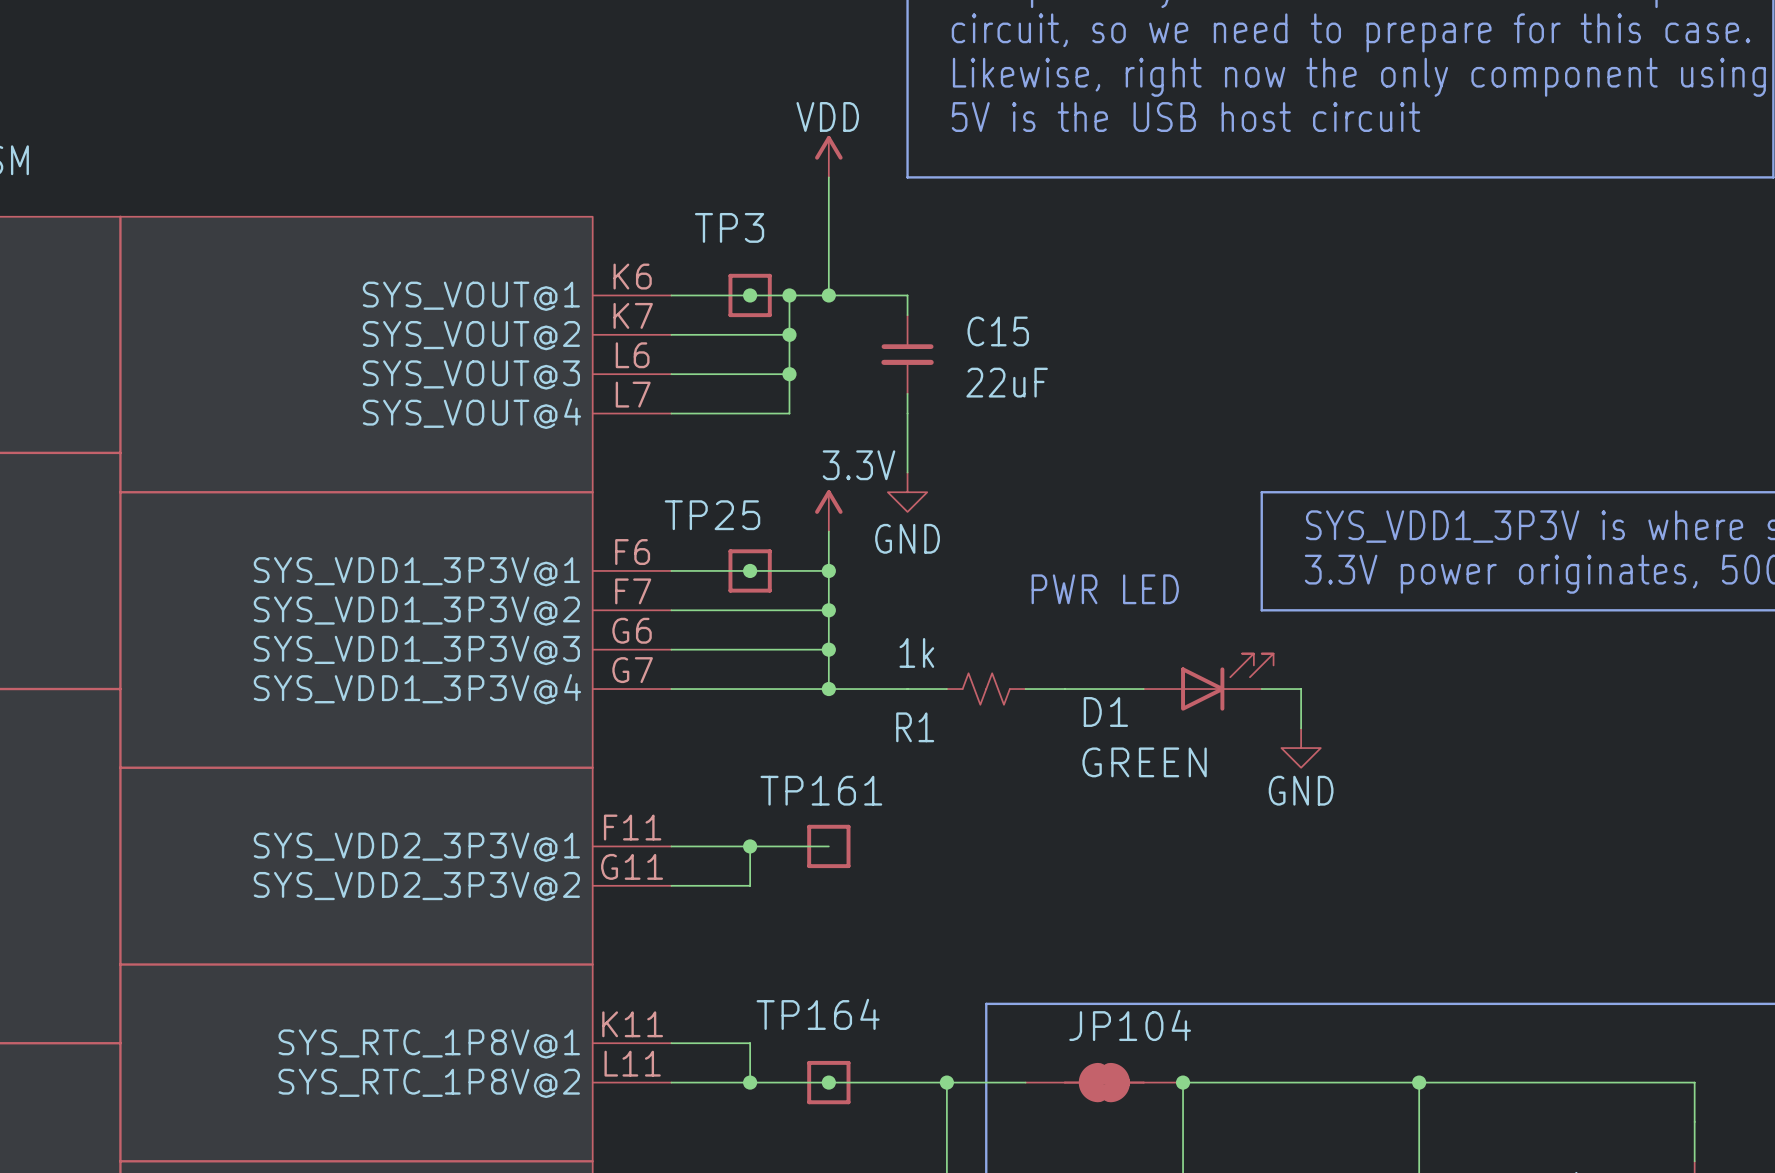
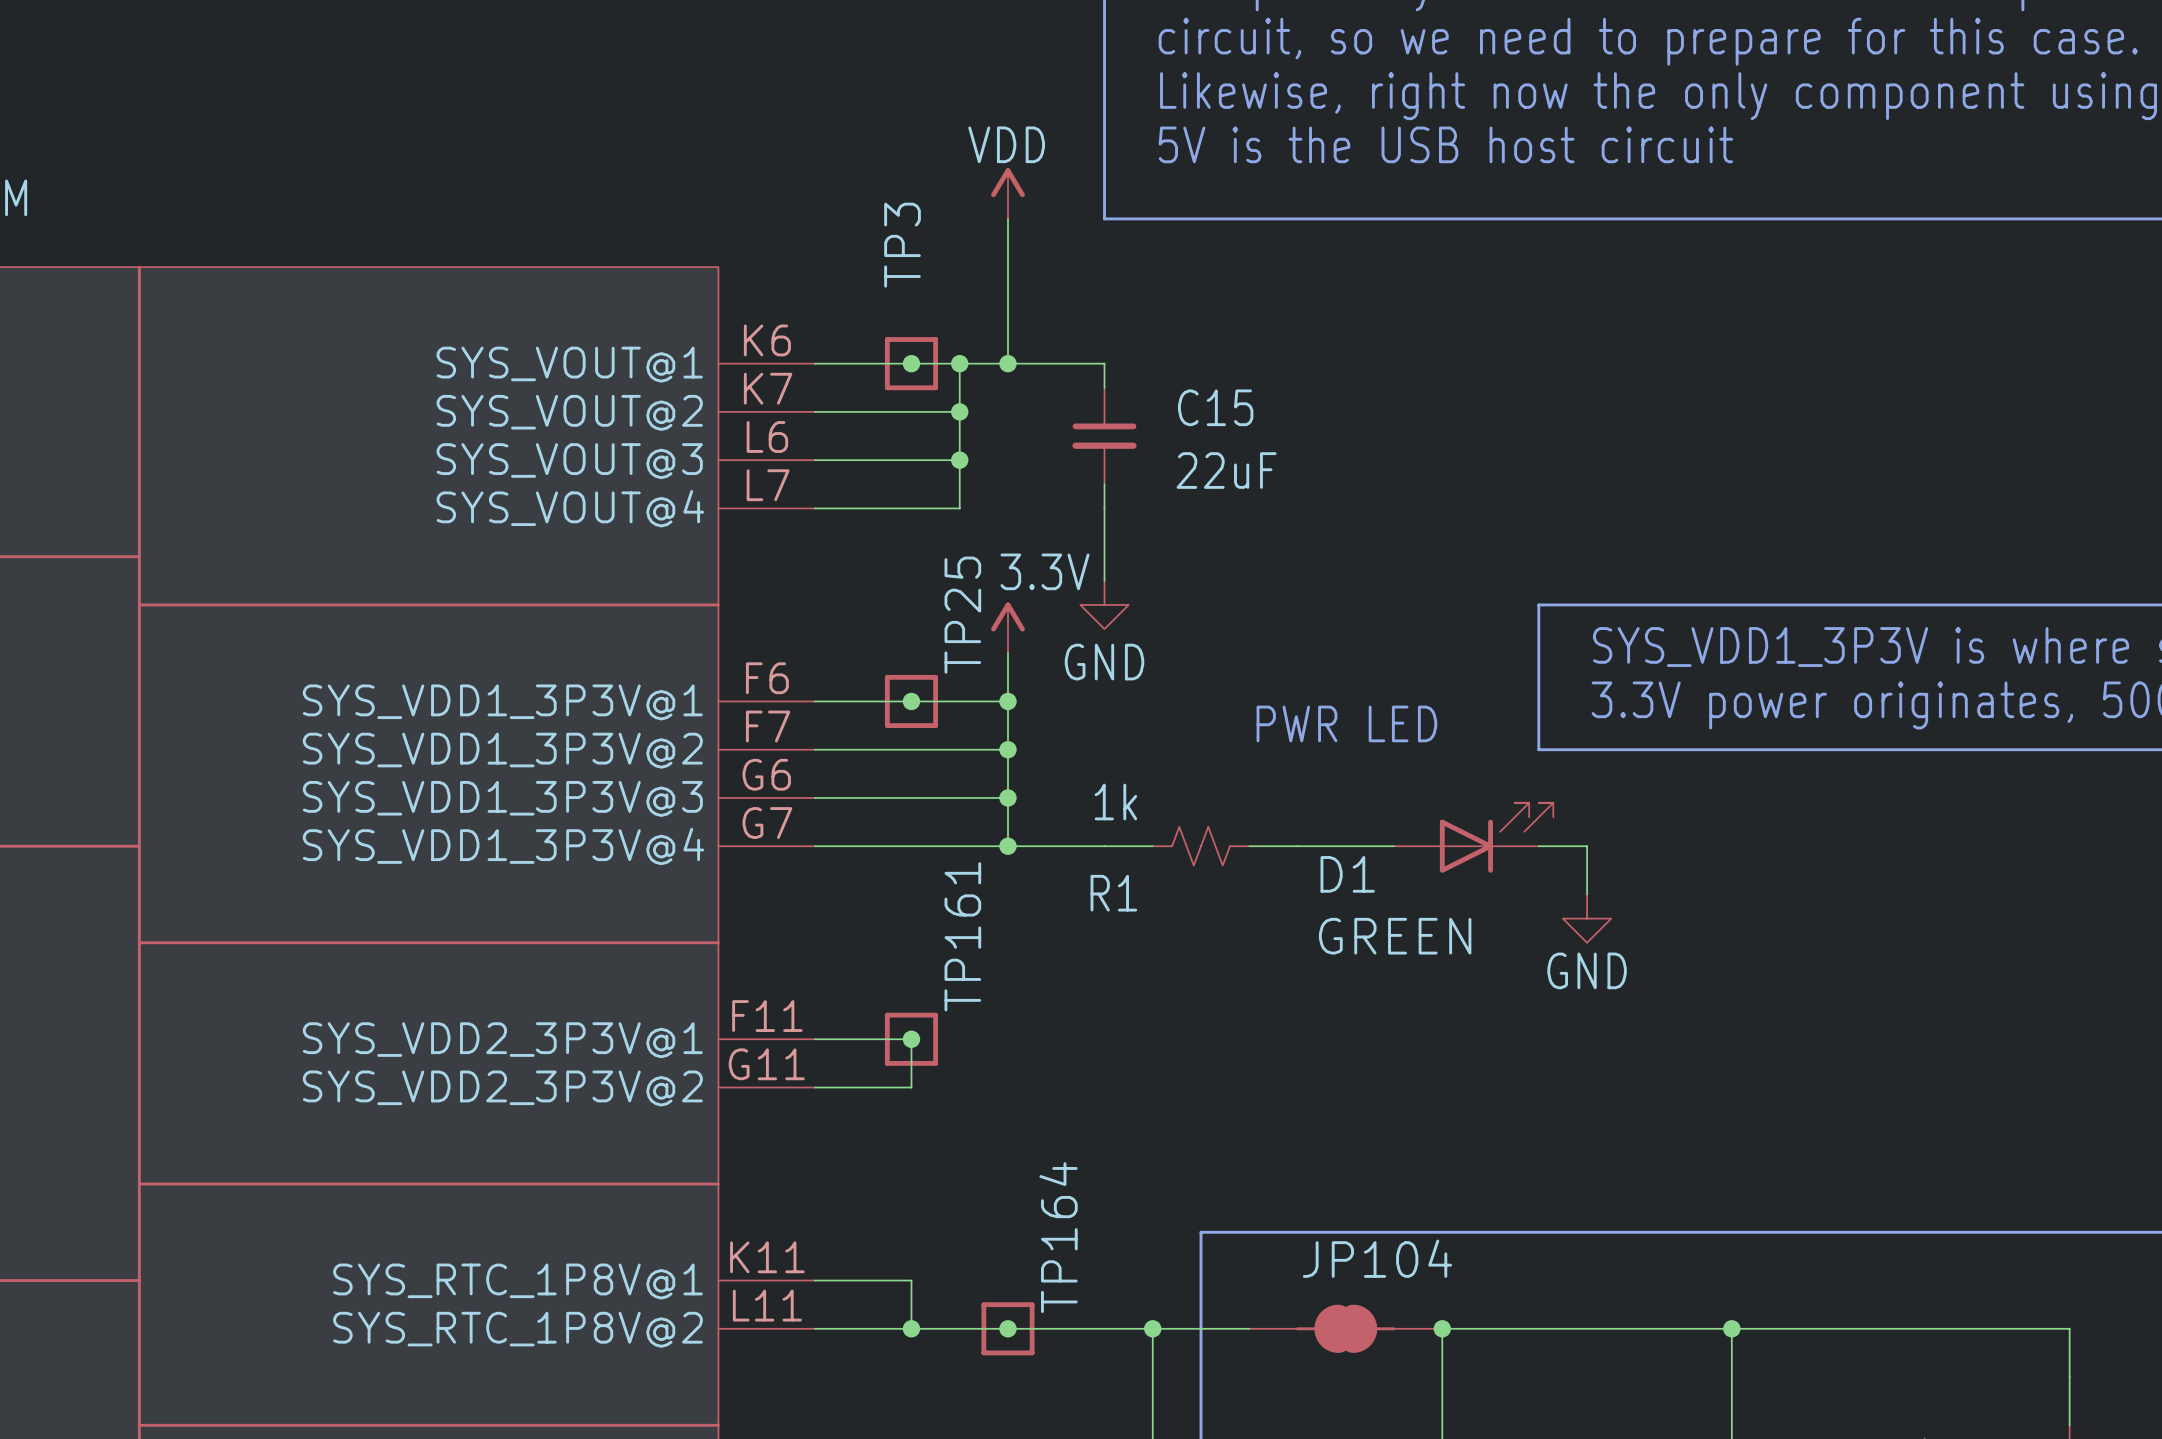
TP3 name rotation: 0° (729, 227) -> 90° counterclockwise (902, 245)
TP25 name rotation: 0° (712, 515) -> 90° counterclockwise (962, 615)
TP161 name rotation: 0° (821, 790) -> 90° counterclockwise (962, 936)
wire: (750, 846) (828, 846) -> none
TP161 position: (828, 846) -> (911, 1039)
TP164 name rotation: 0° (818, 1014) -> 90° counterclockwise (1058, 1237)

